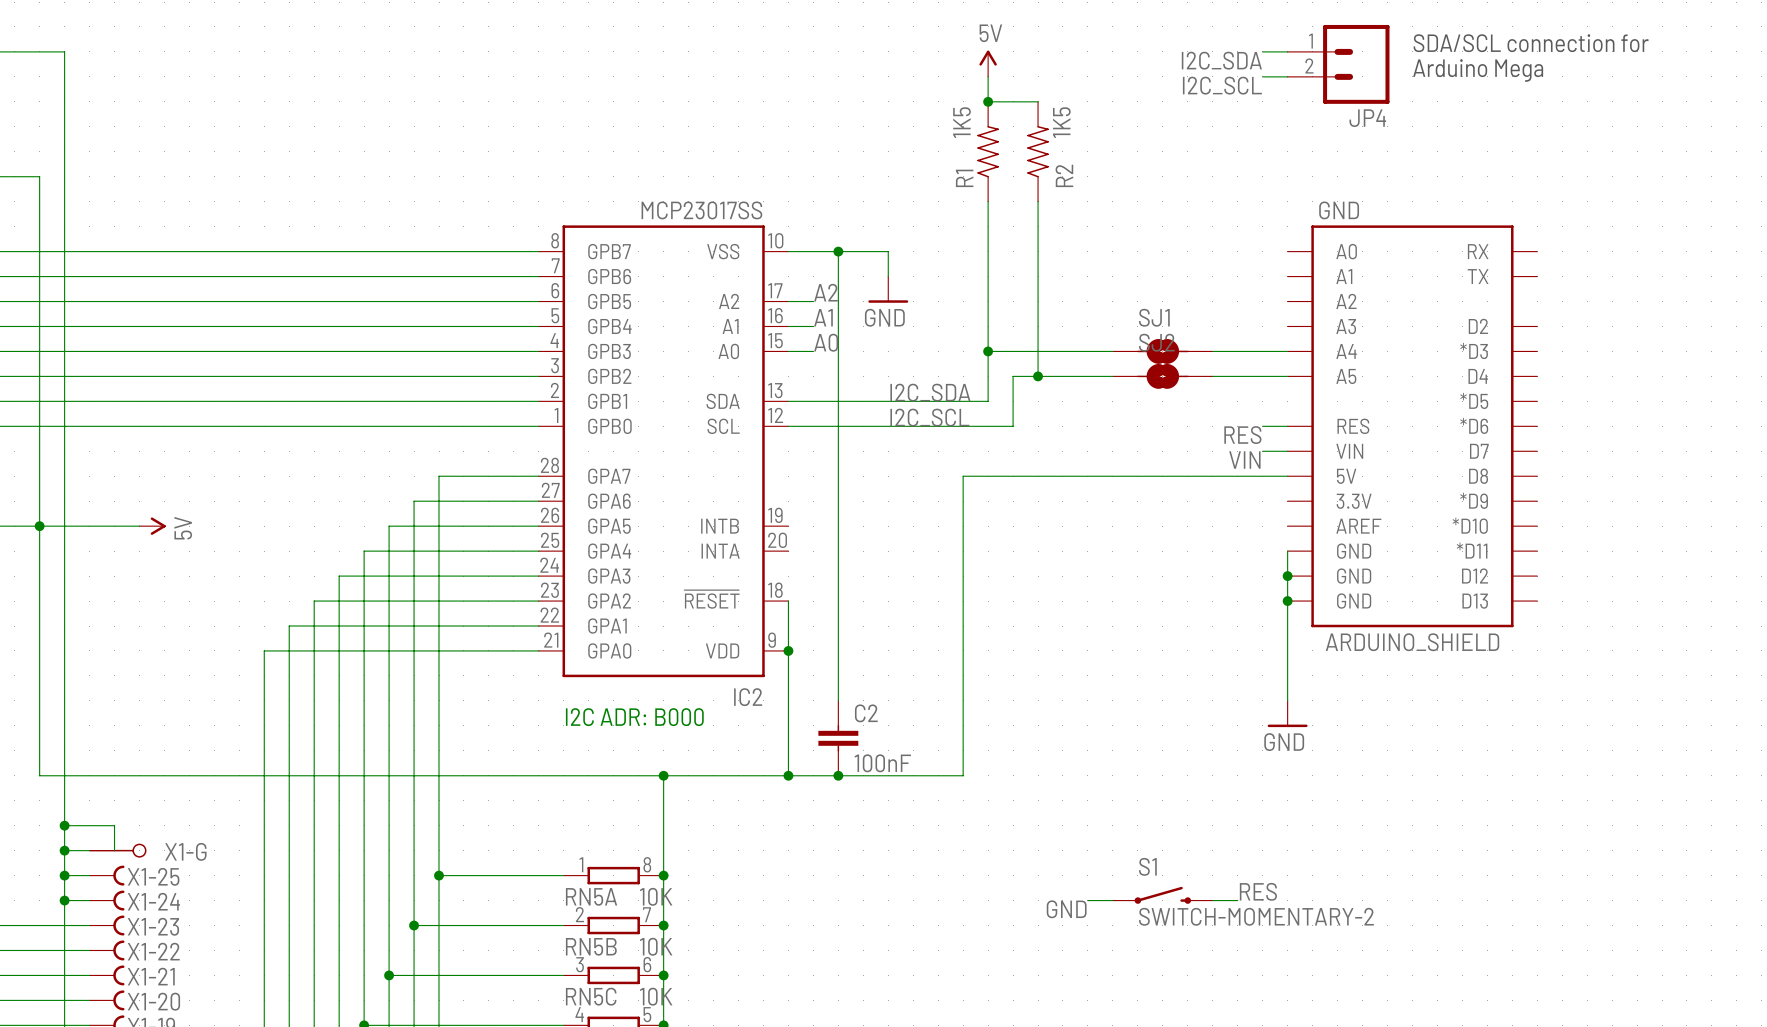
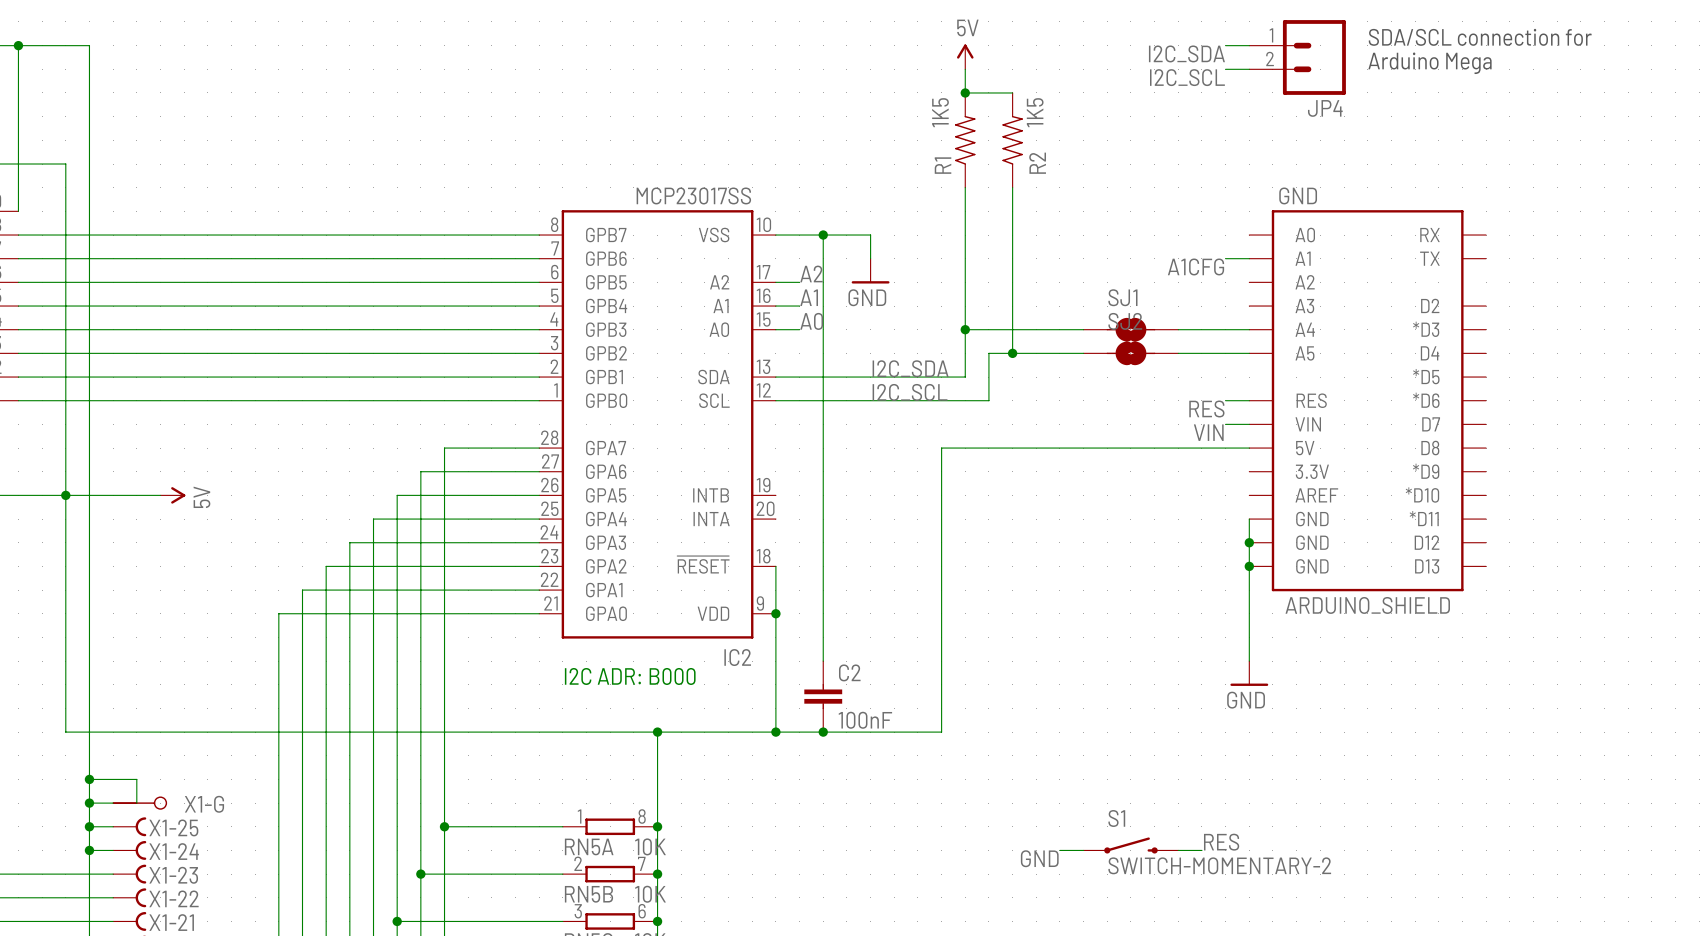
wire: none -> (1225, 258) (1249, 258)
label: none -> A1CFG (1195, 266)

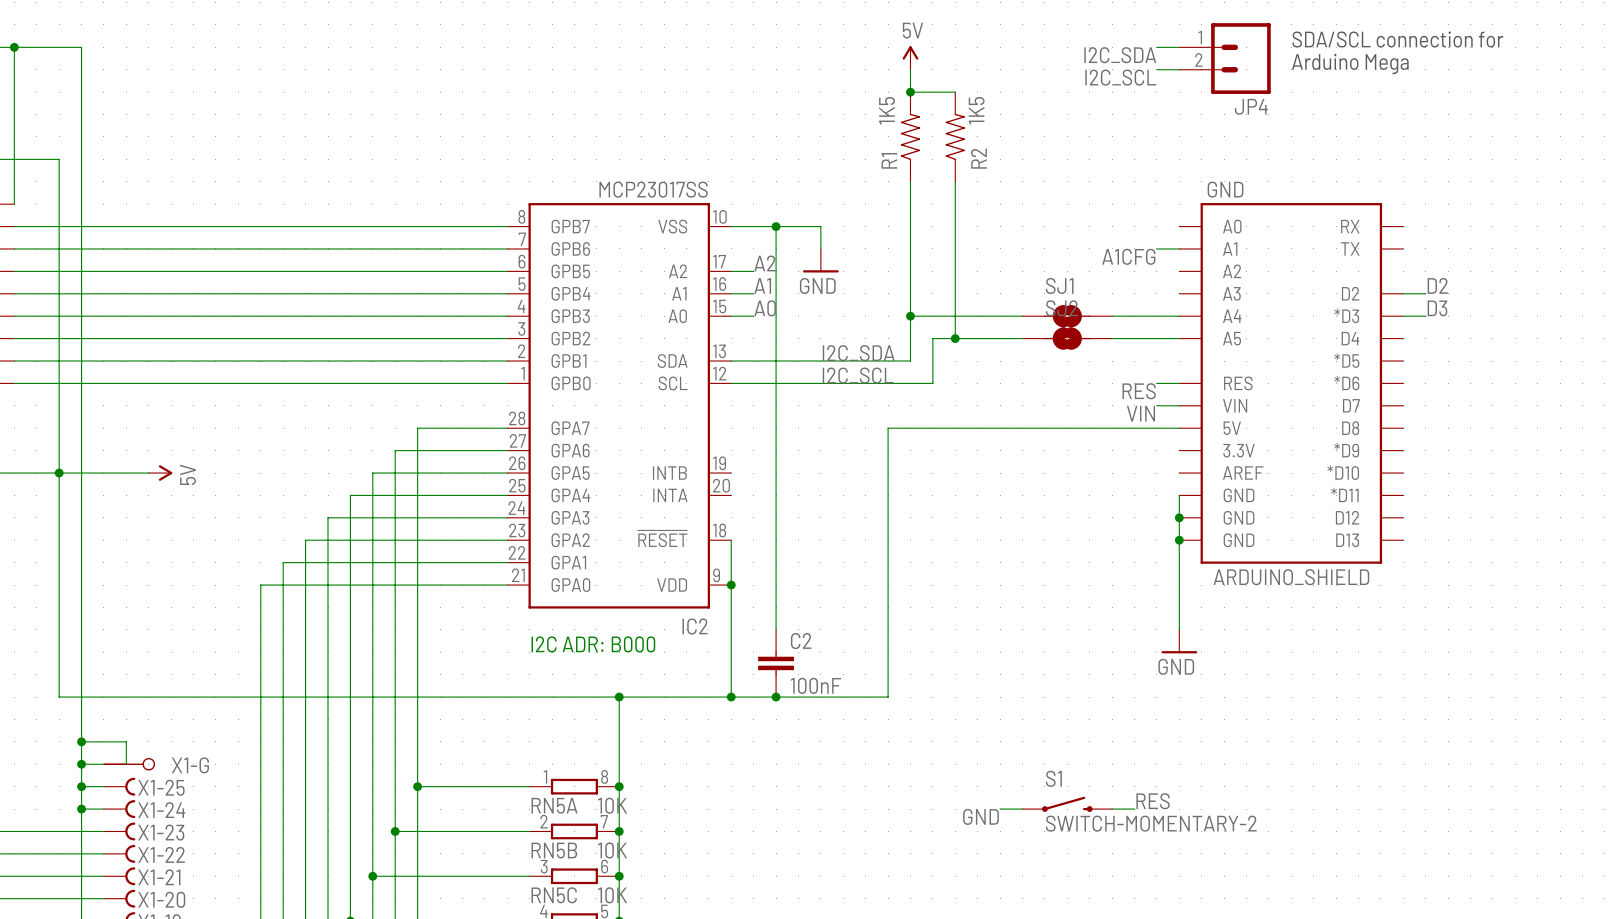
label: none -> D2 (1437, 285)
wire: none -> (1403, 293) (1425, 293)
label: none -> D3 (1437, 308)
wire: none -> (1403, 316) (1425, 316)

